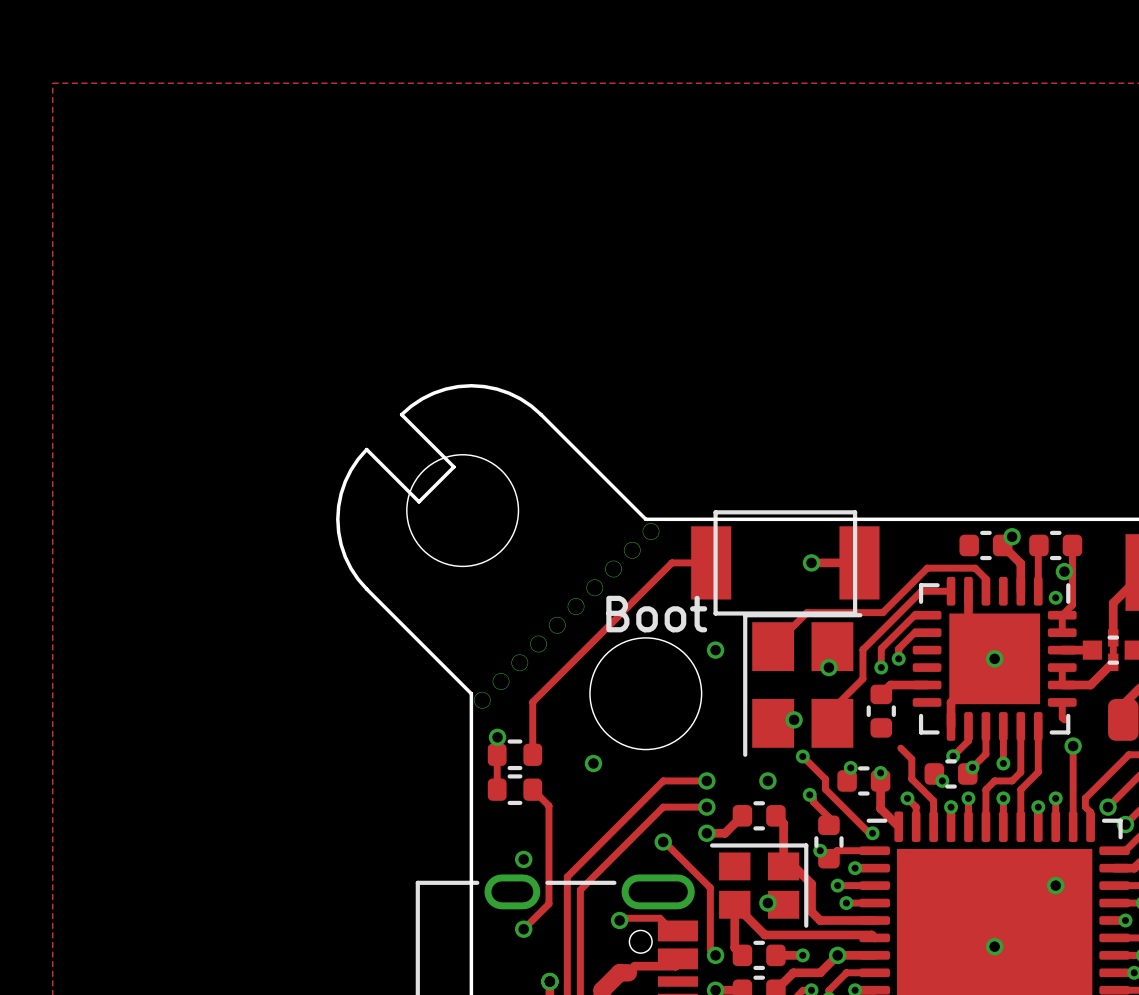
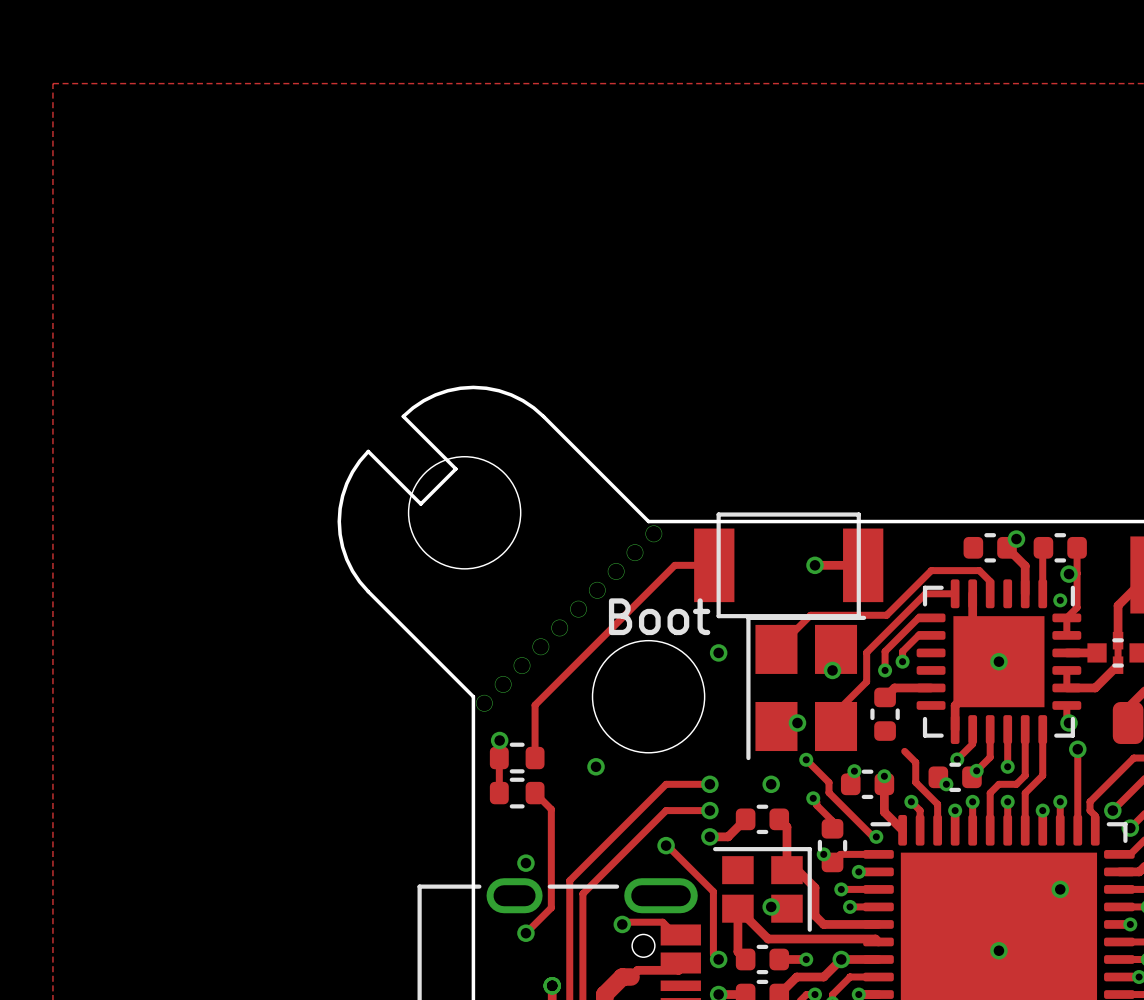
via: none -> (1069, 723)

